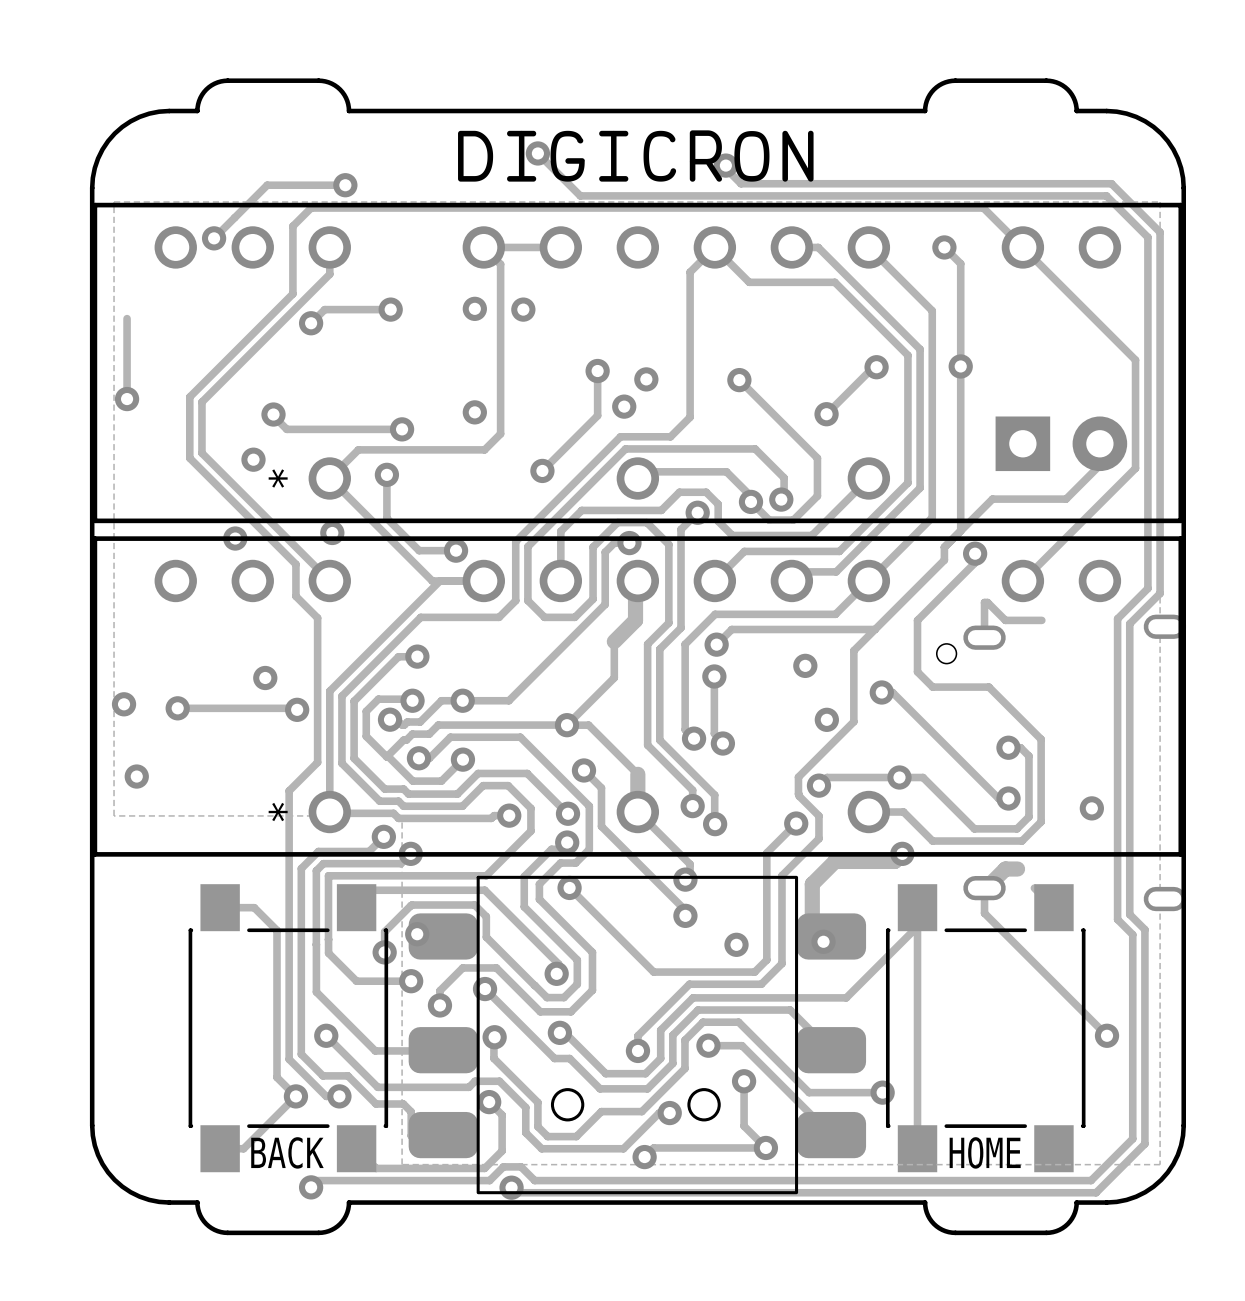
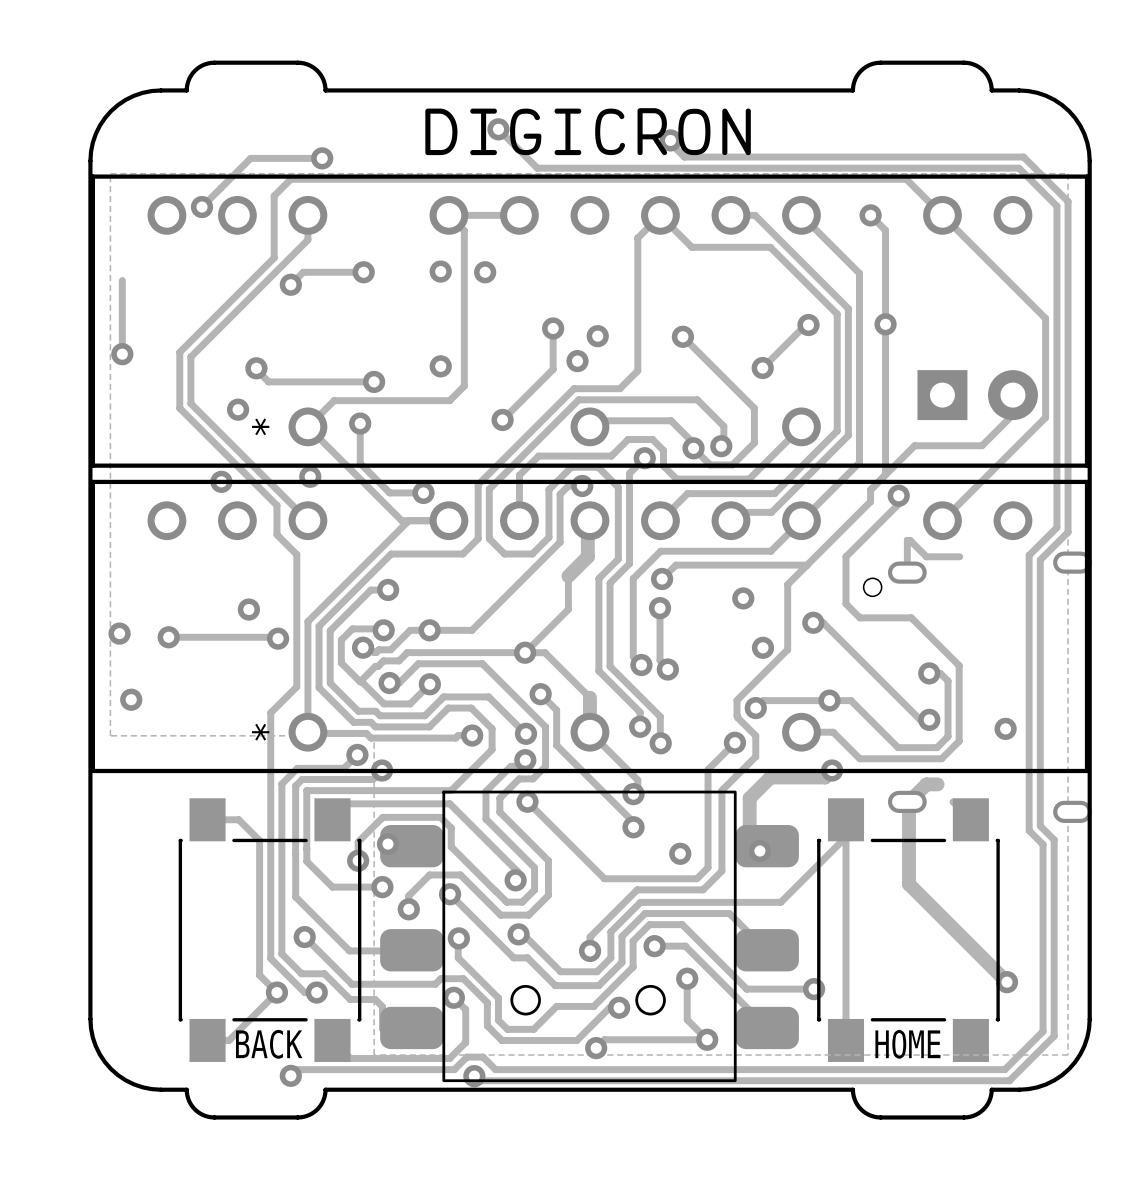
track: (984, 888) (984, 913) (1107, 1035) -> none
track: none -> (909, 801) (909, 884) (1006, 982)
via position: (1107, 1035) -> (1006, 982)

